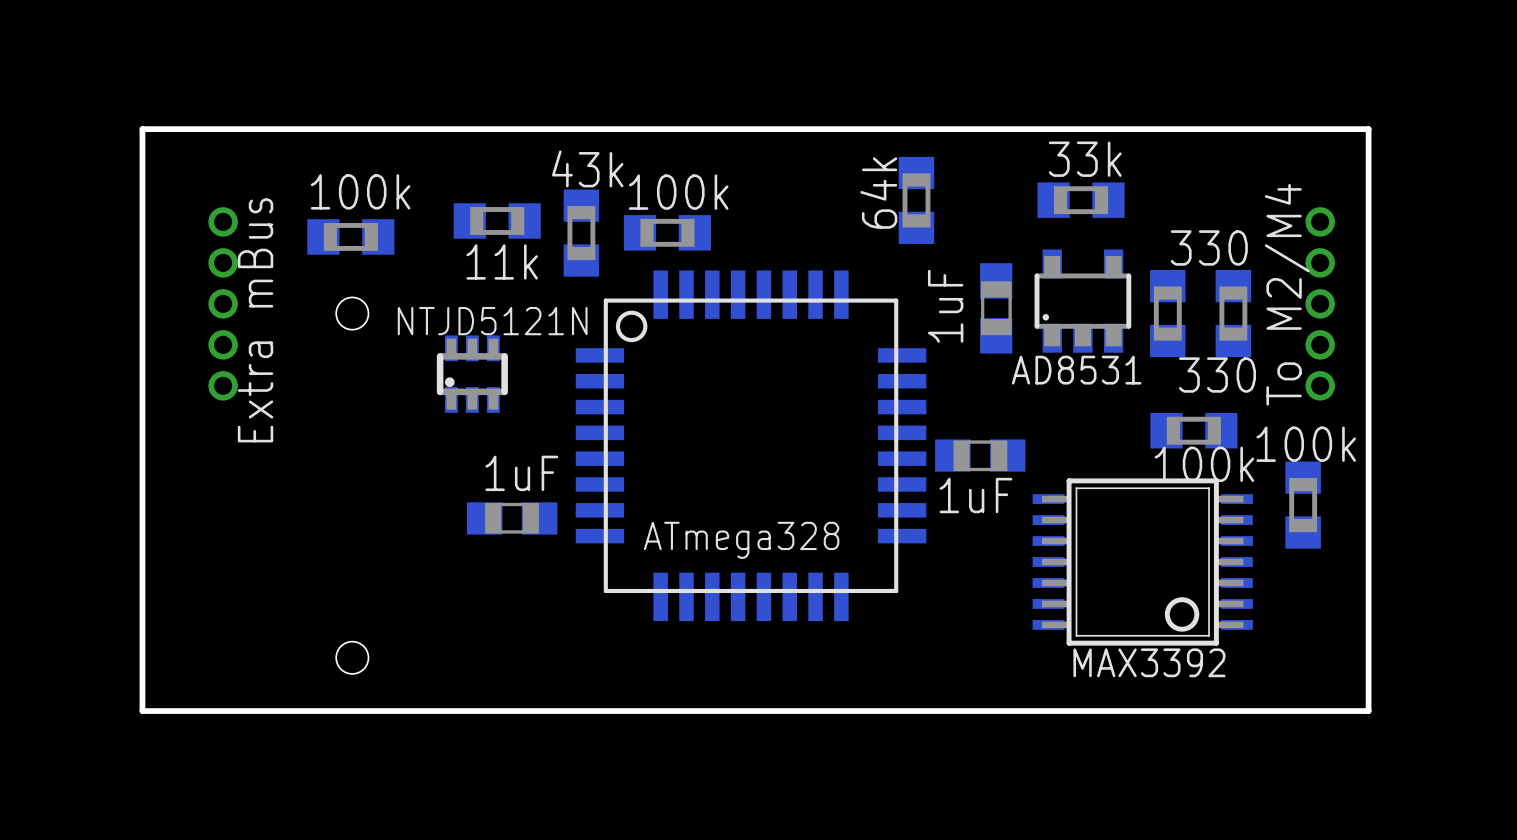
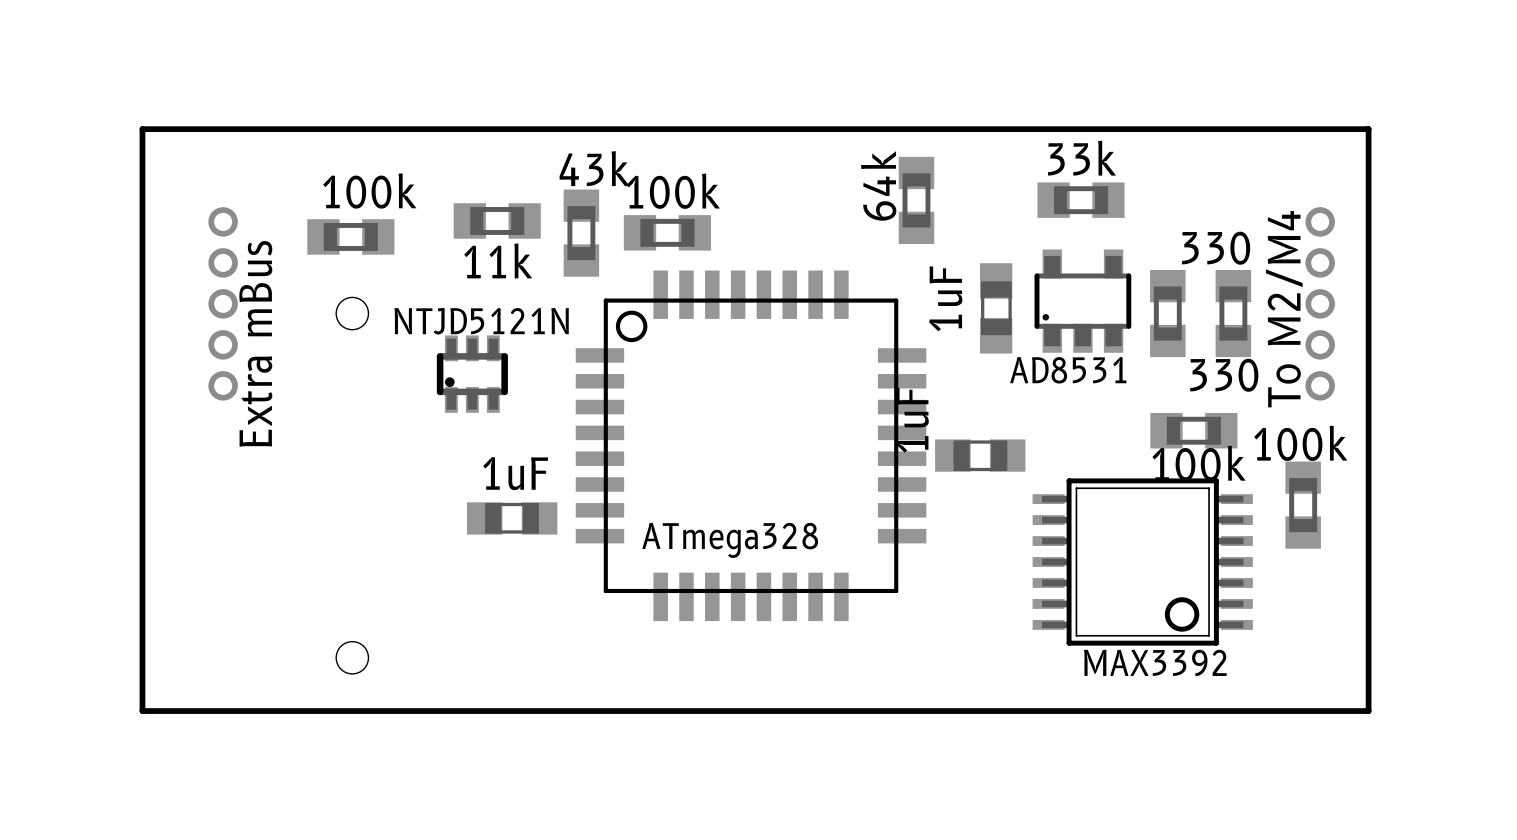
part value rotation: 0° (975, 495) -> 90° counterclockwise (912, 420)

